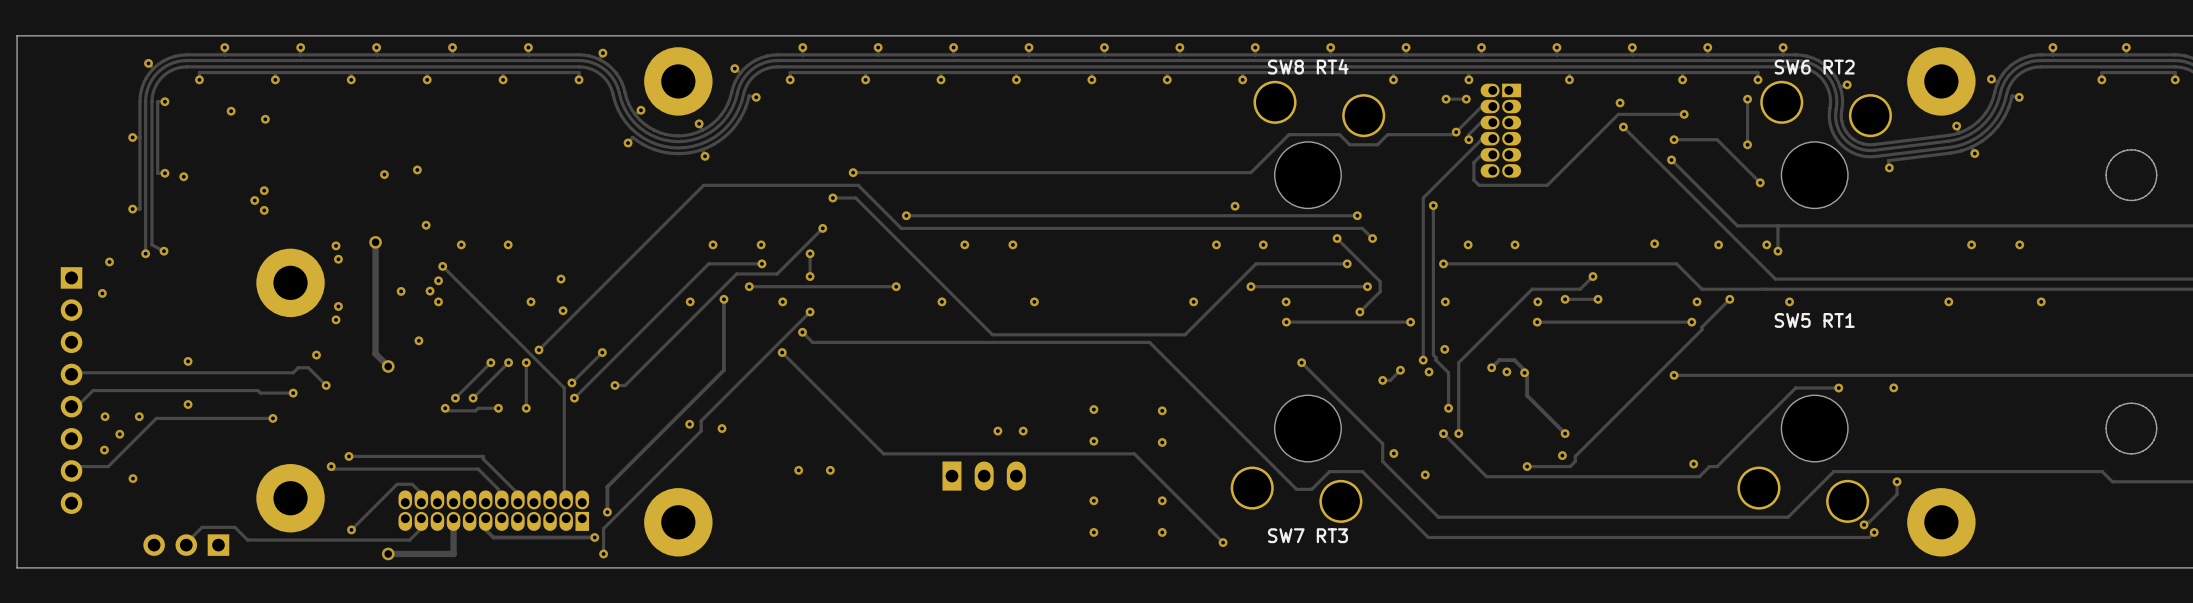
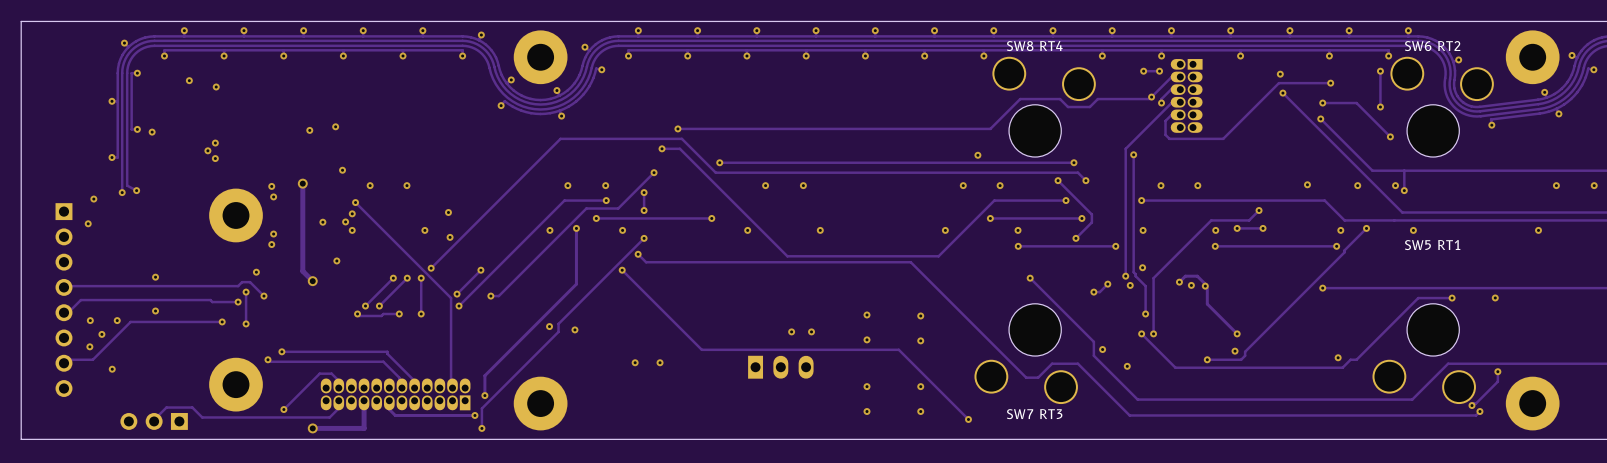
track: none -> (246, 292) (246, 323)
via: none -> (246, 292)
via: none -> (246, 323)

